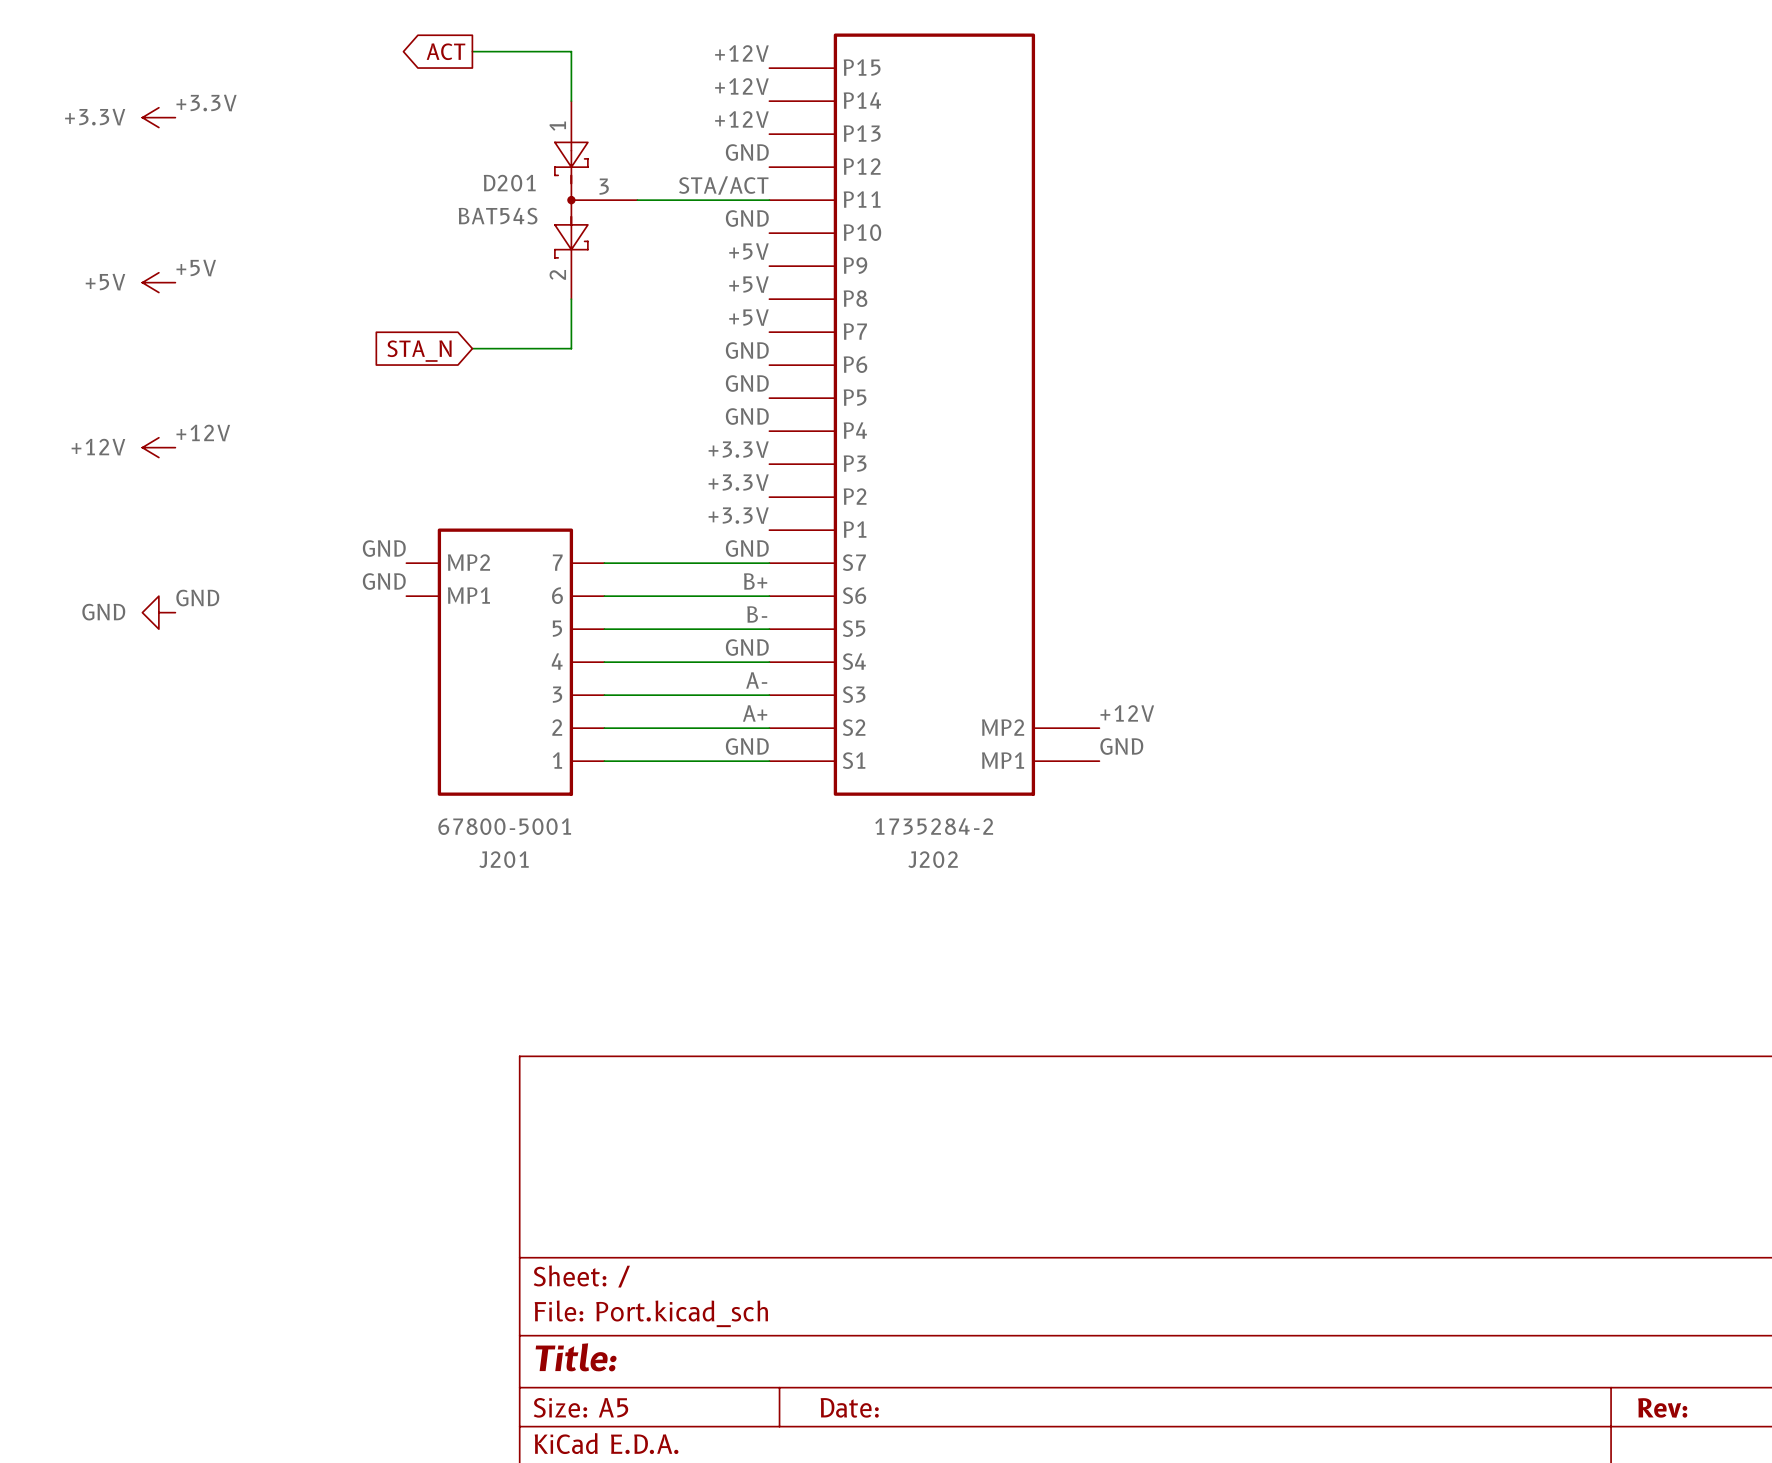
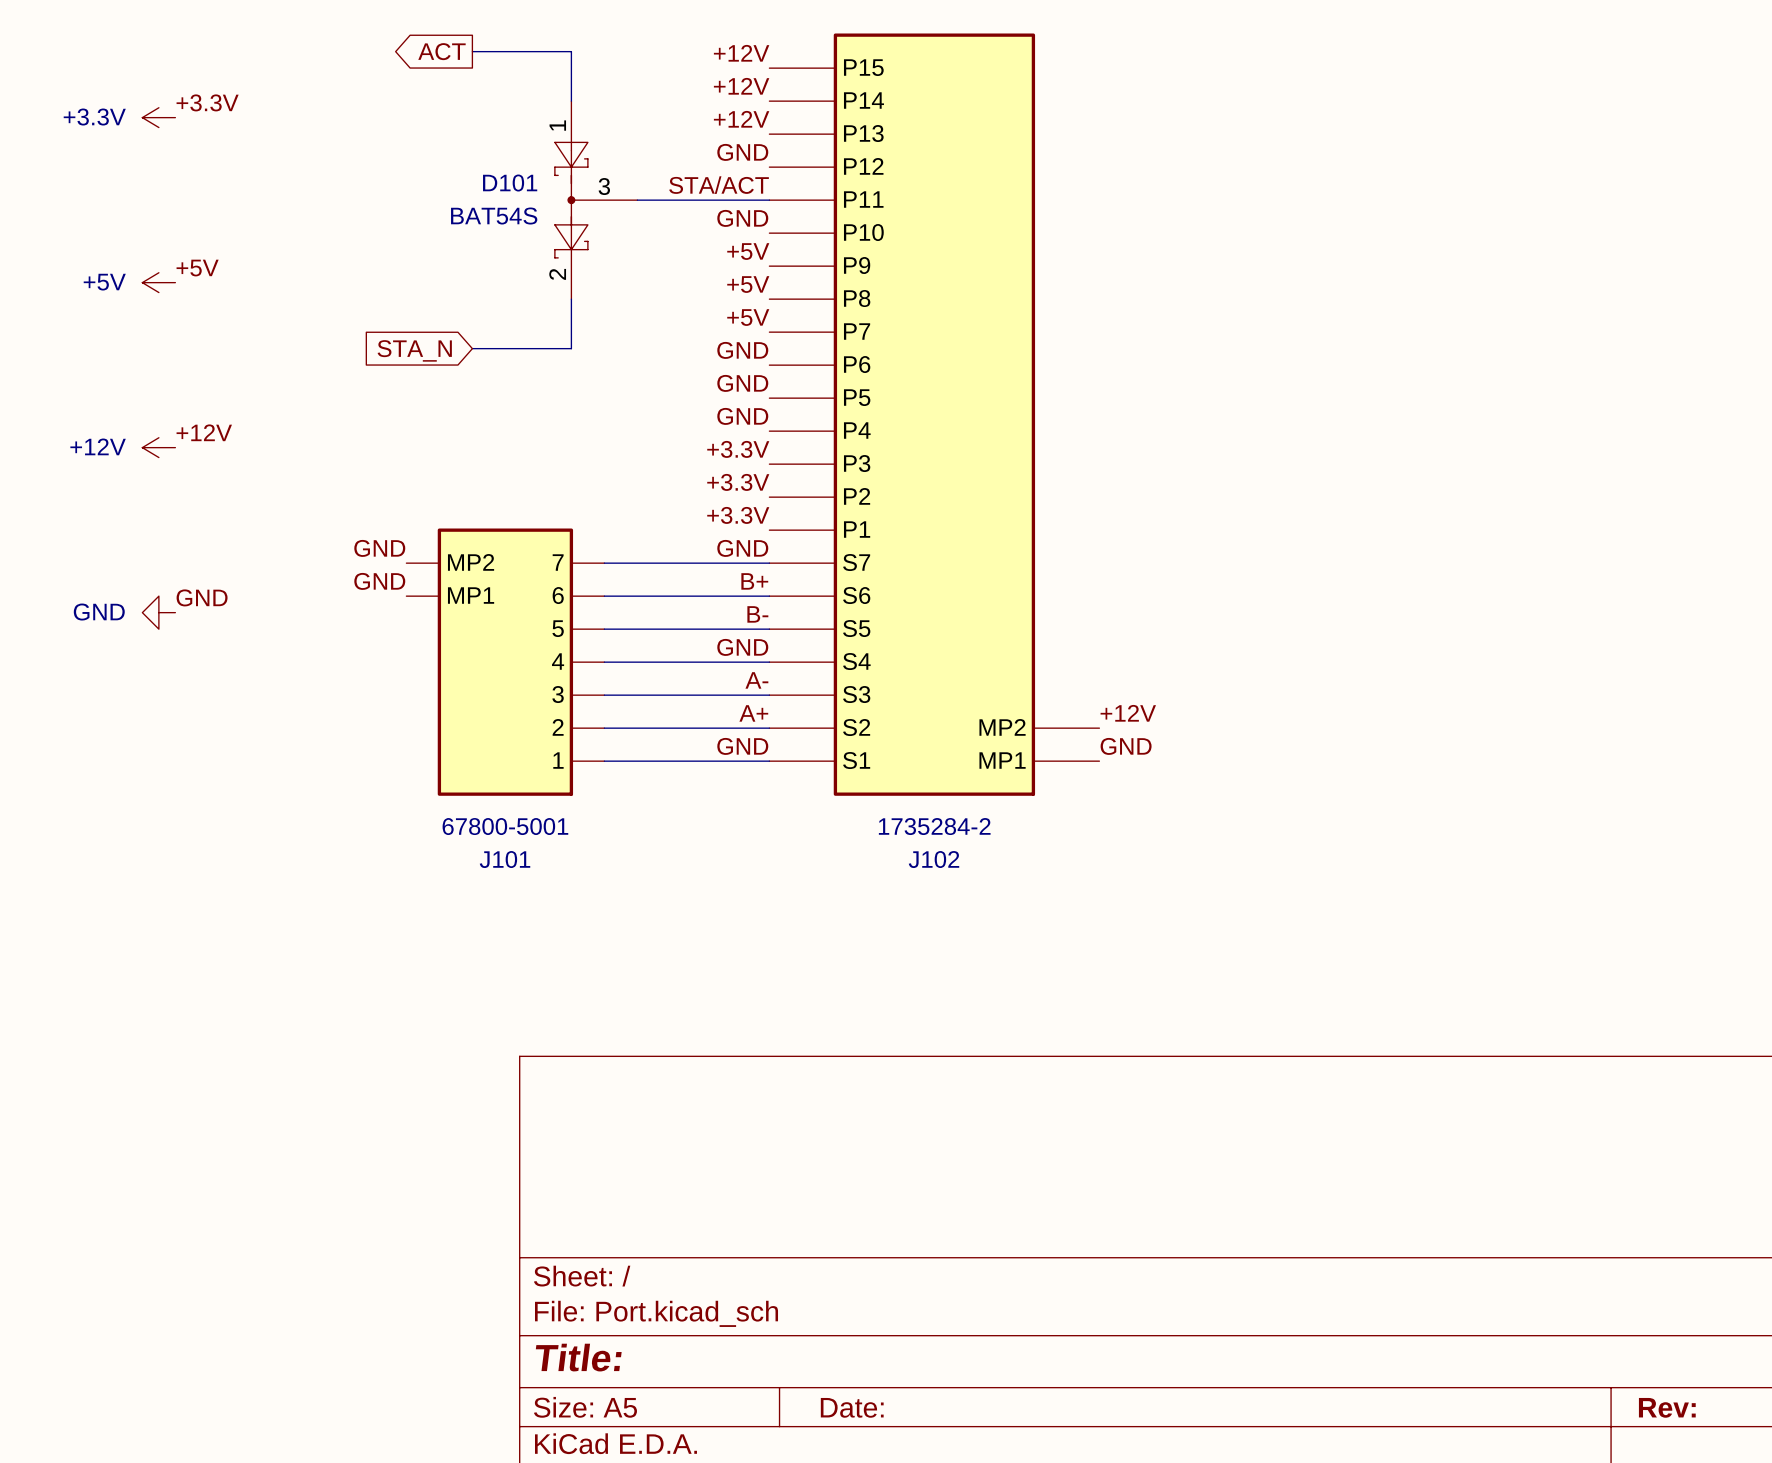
D201 name: D201 (509, 183) -> D101 (510, 183)
J201 name: J201 (504, 859) -> J101 (505, 859)
J202 name: J202 (933, 859) -> J102 (933, 859)

